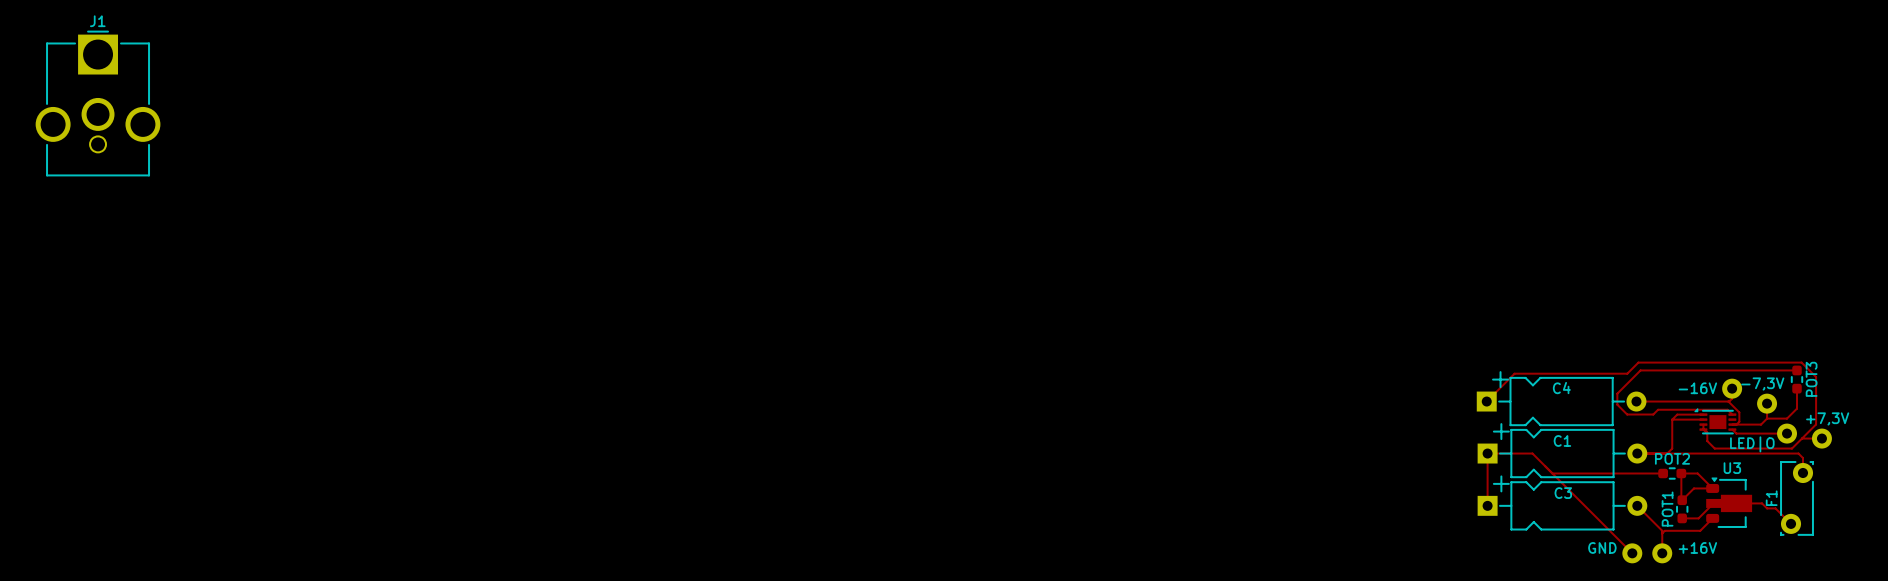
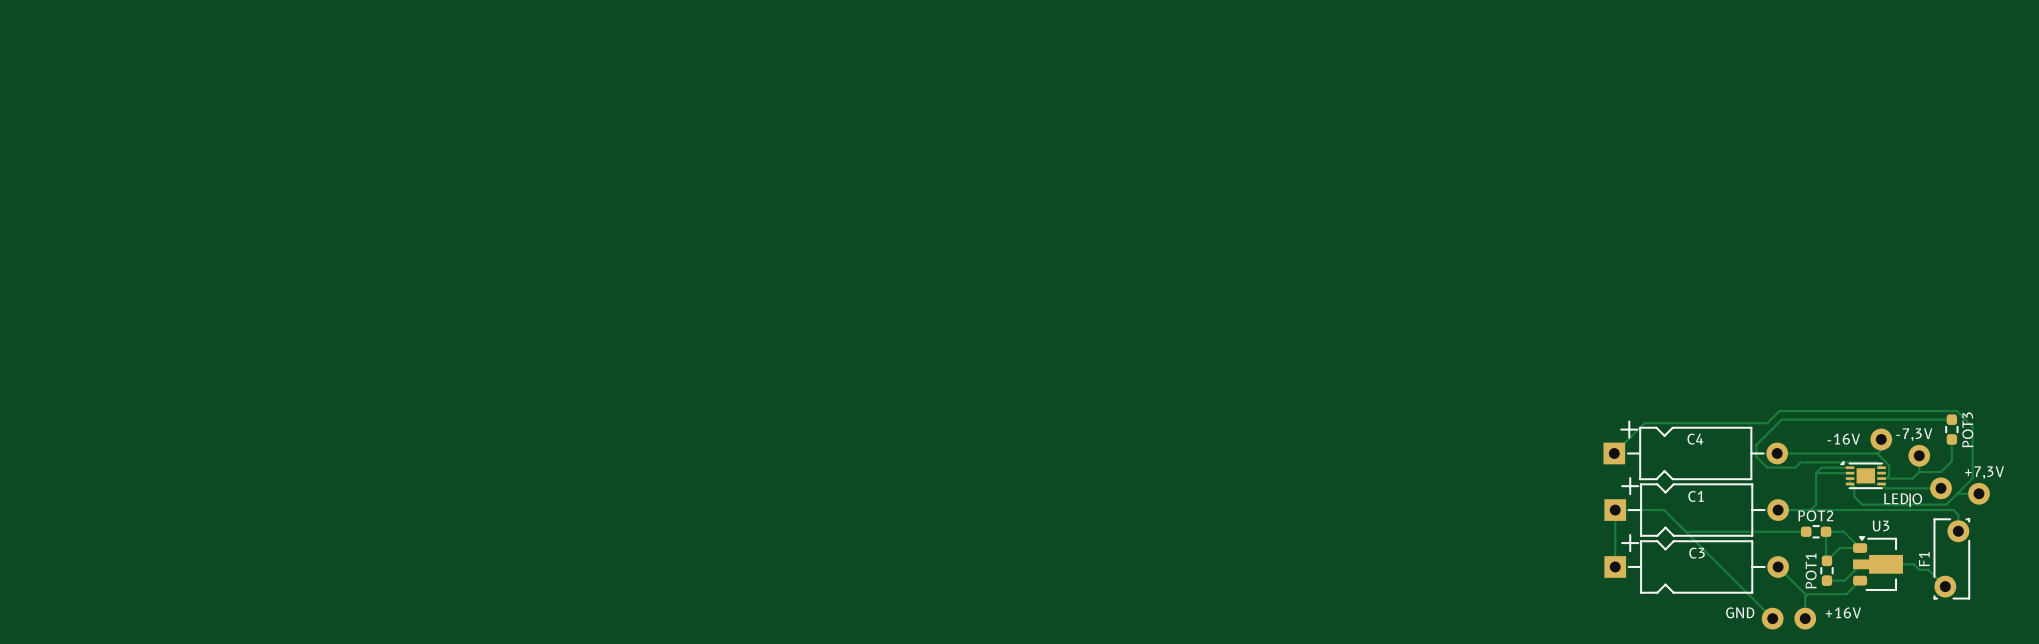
J1: (98, 103) -> none

